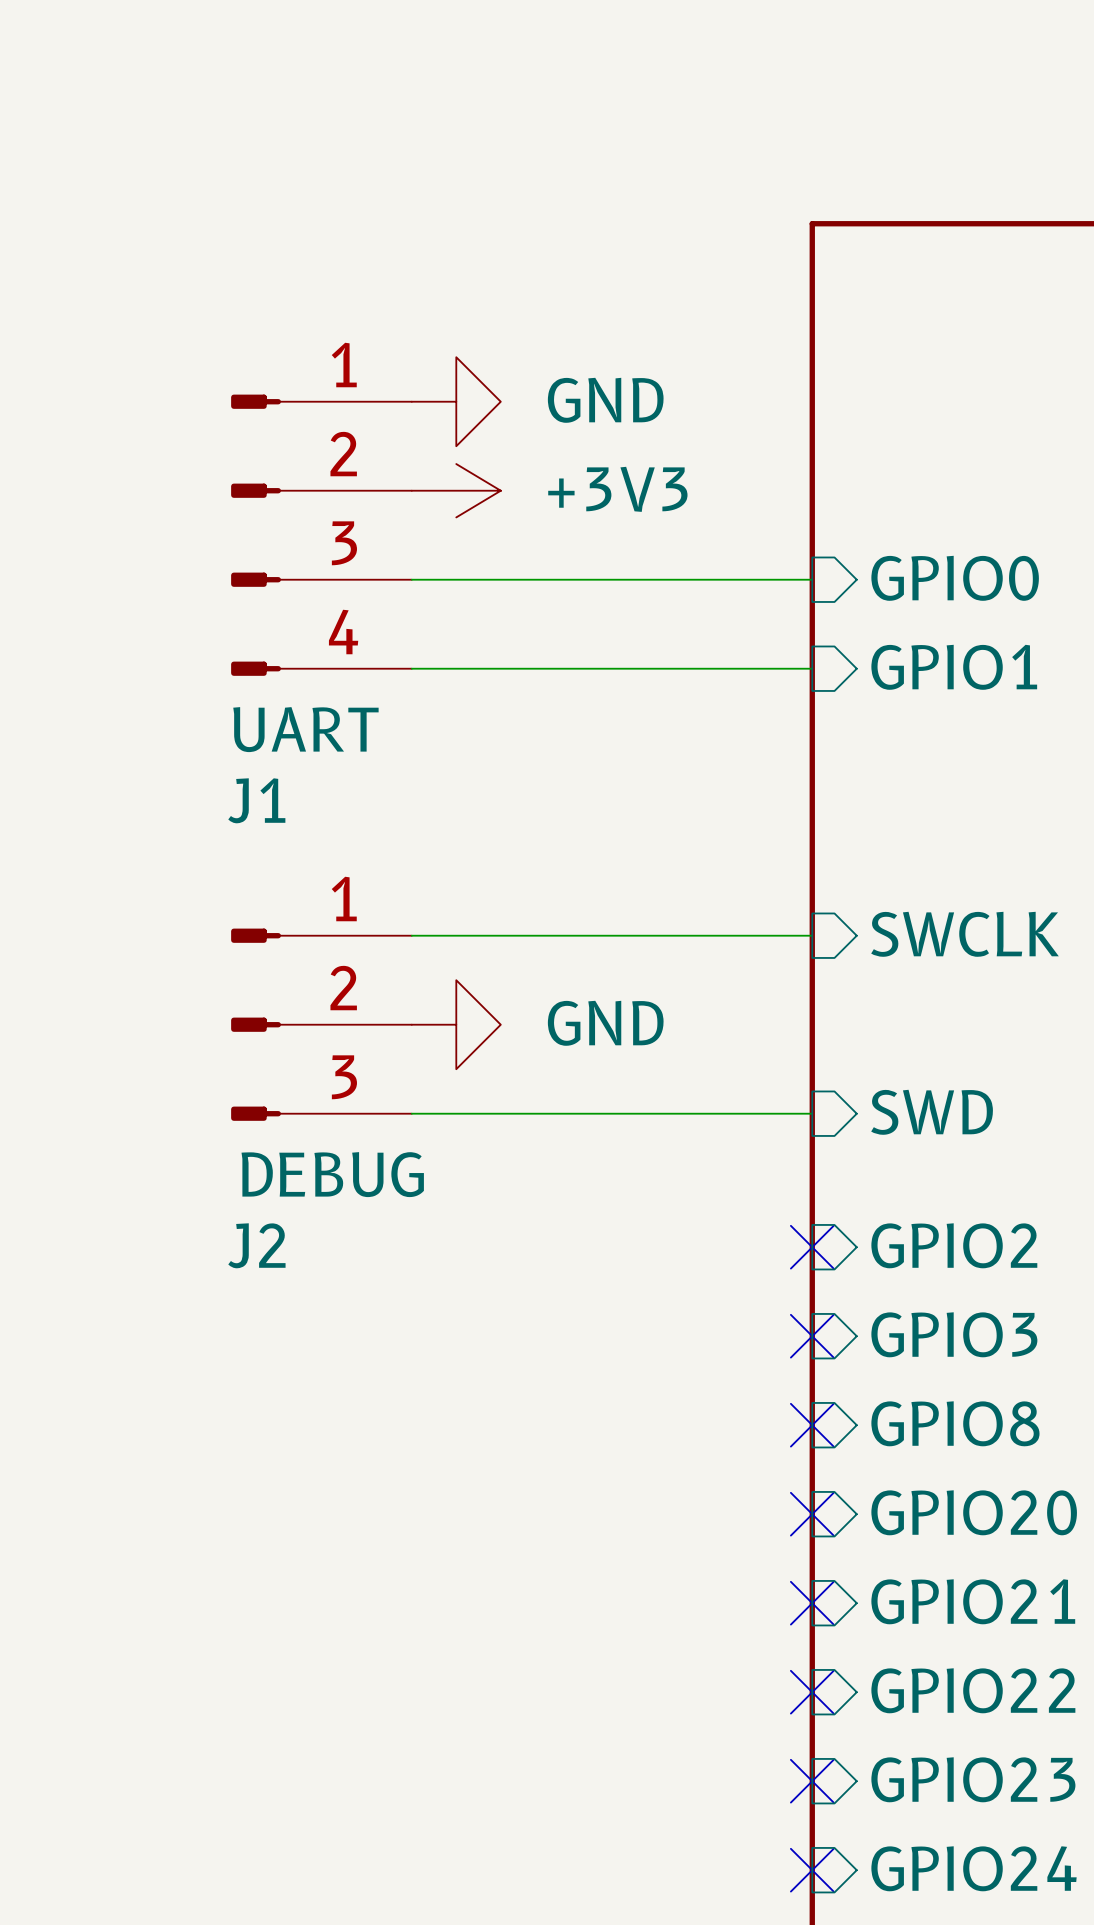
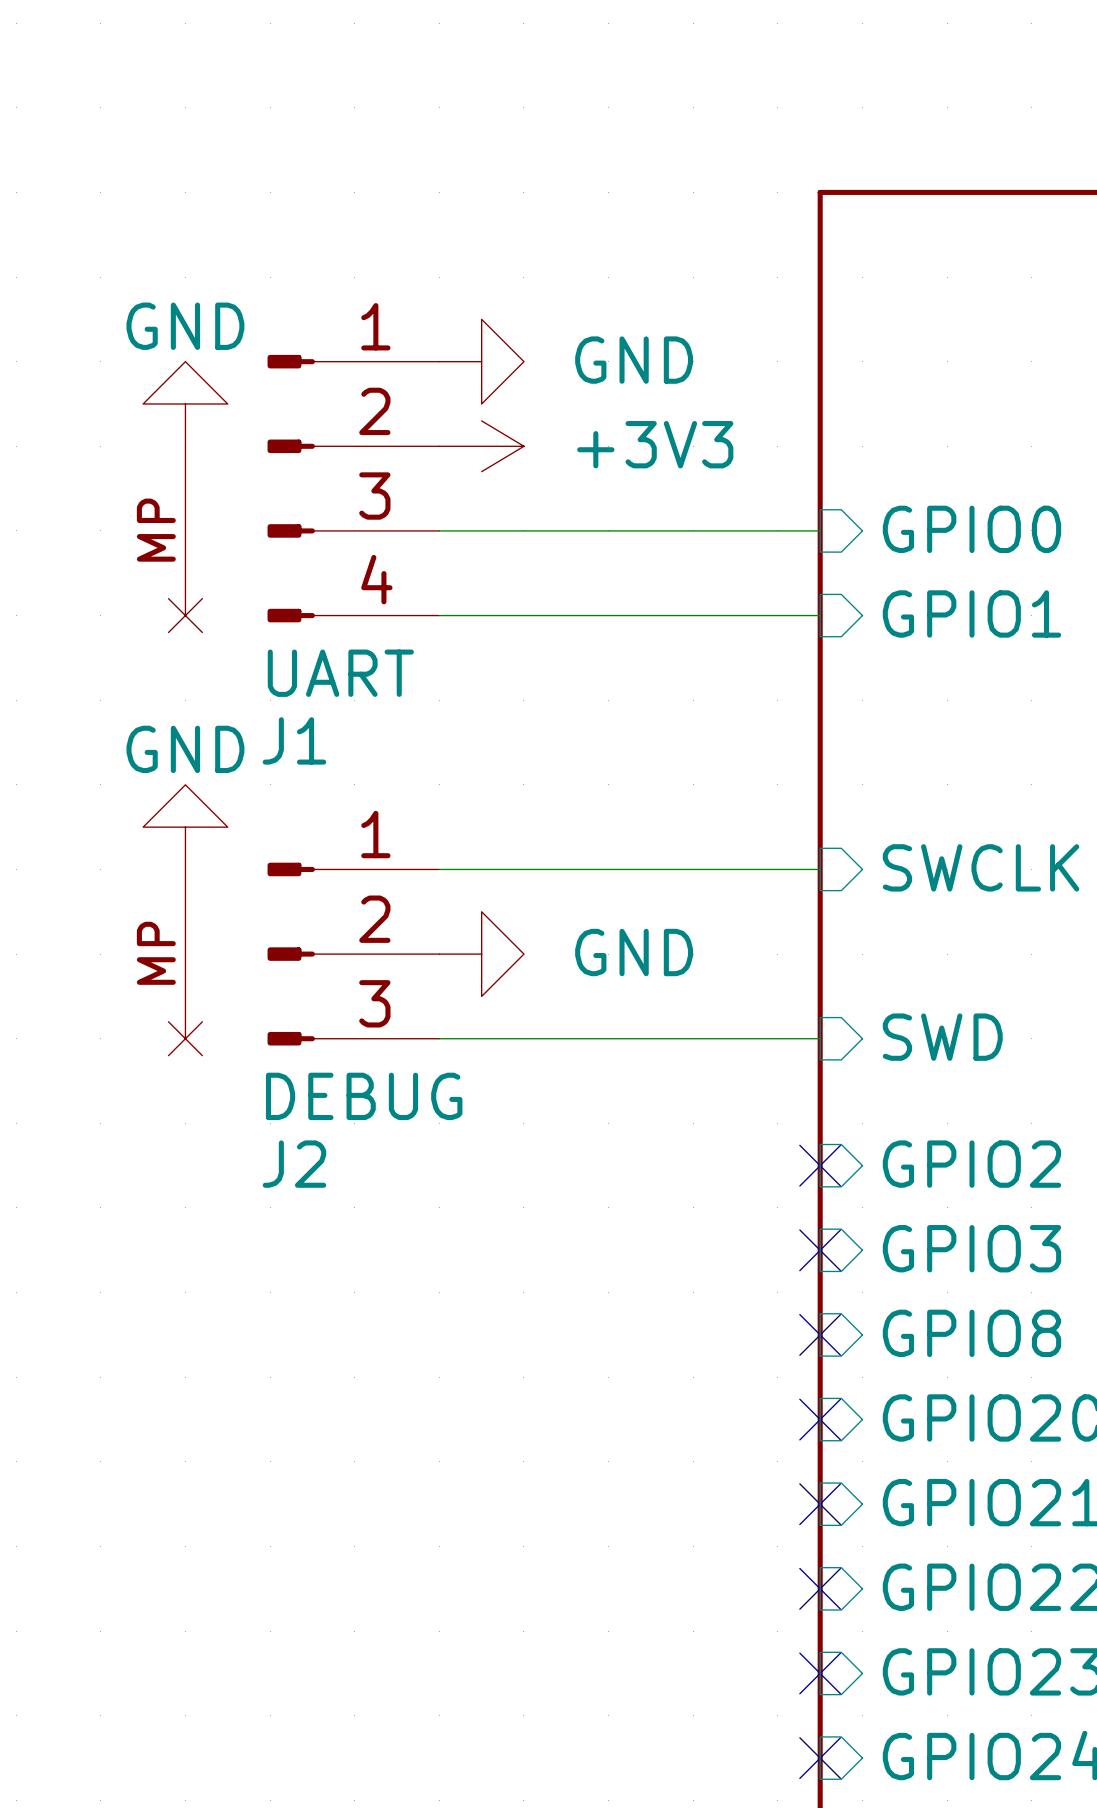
J1 symbol: [231, 394, 412, 676] -> [168, 354, 440, 633]
power symbol: none -> GND (185, 403)
power symbol: none -> GND (185, 827)
J2 symbol: [231, 928, 412, 1121] -> [168, 862, 440, 1056]

